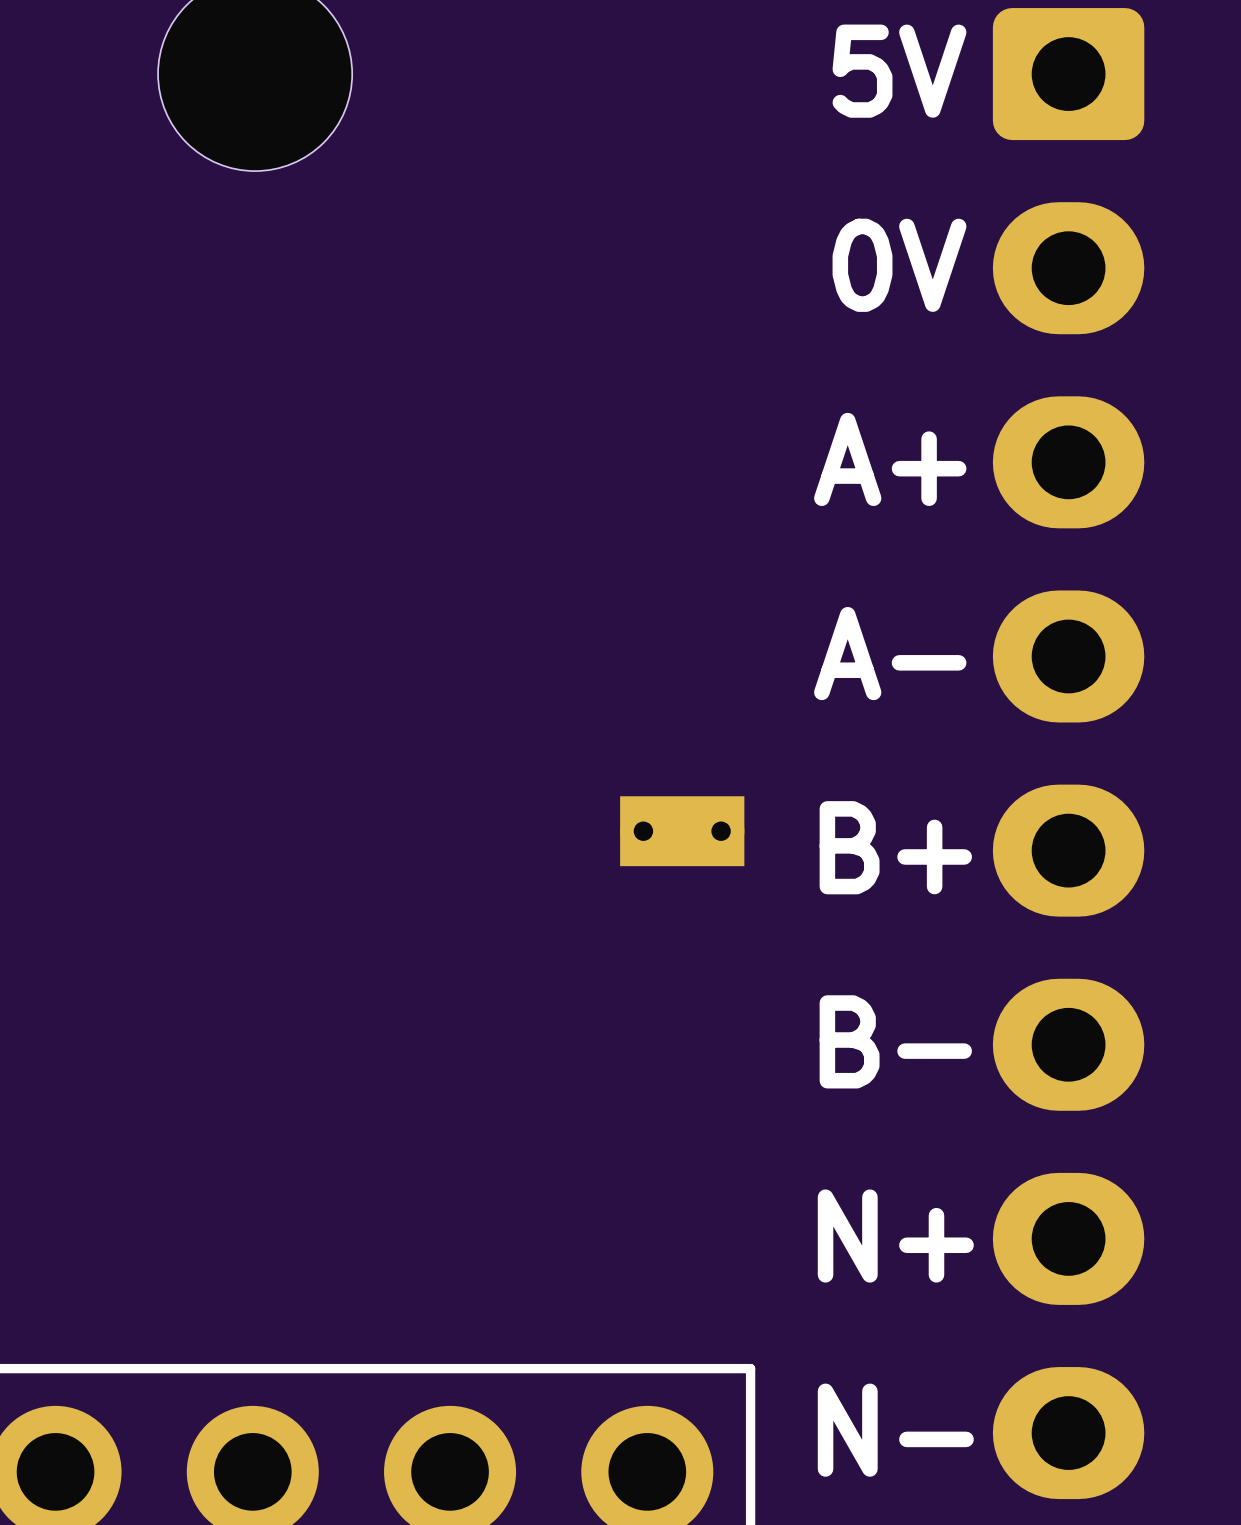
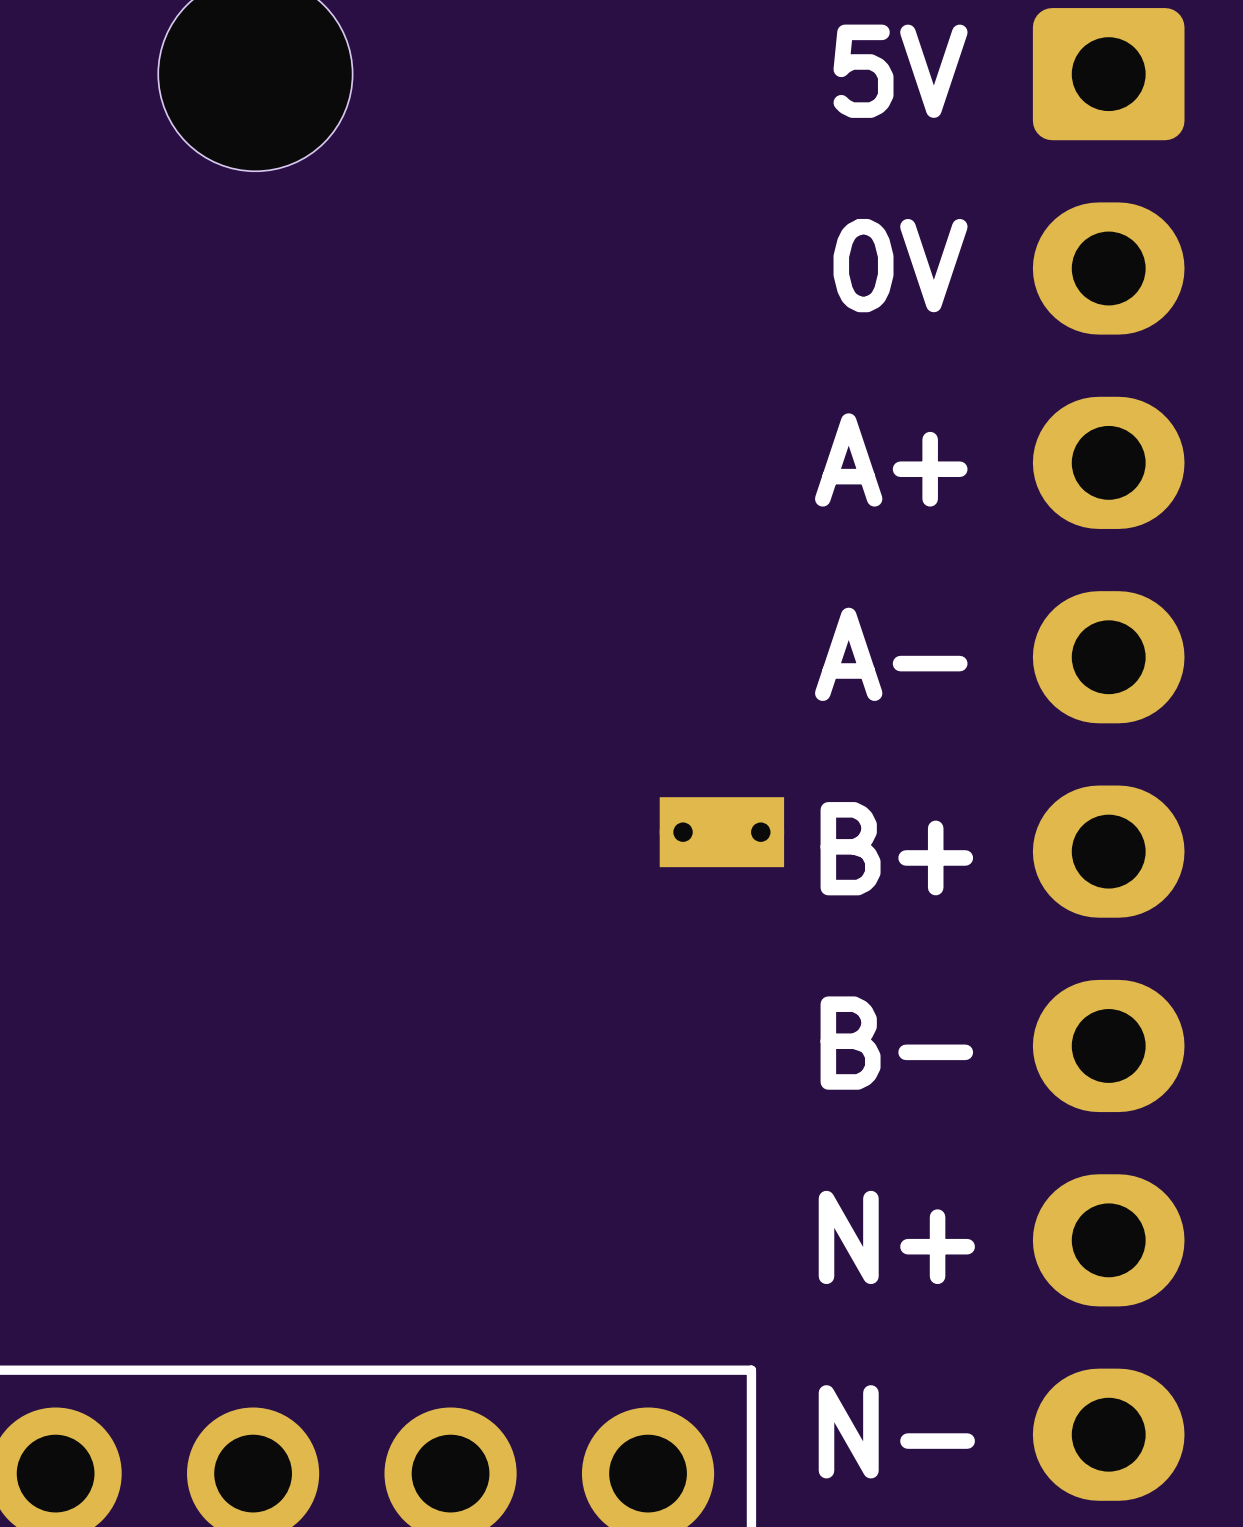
part position: (1068, 753) -> (1108, 754)
part position: (682, 831) -> (721, 832)

